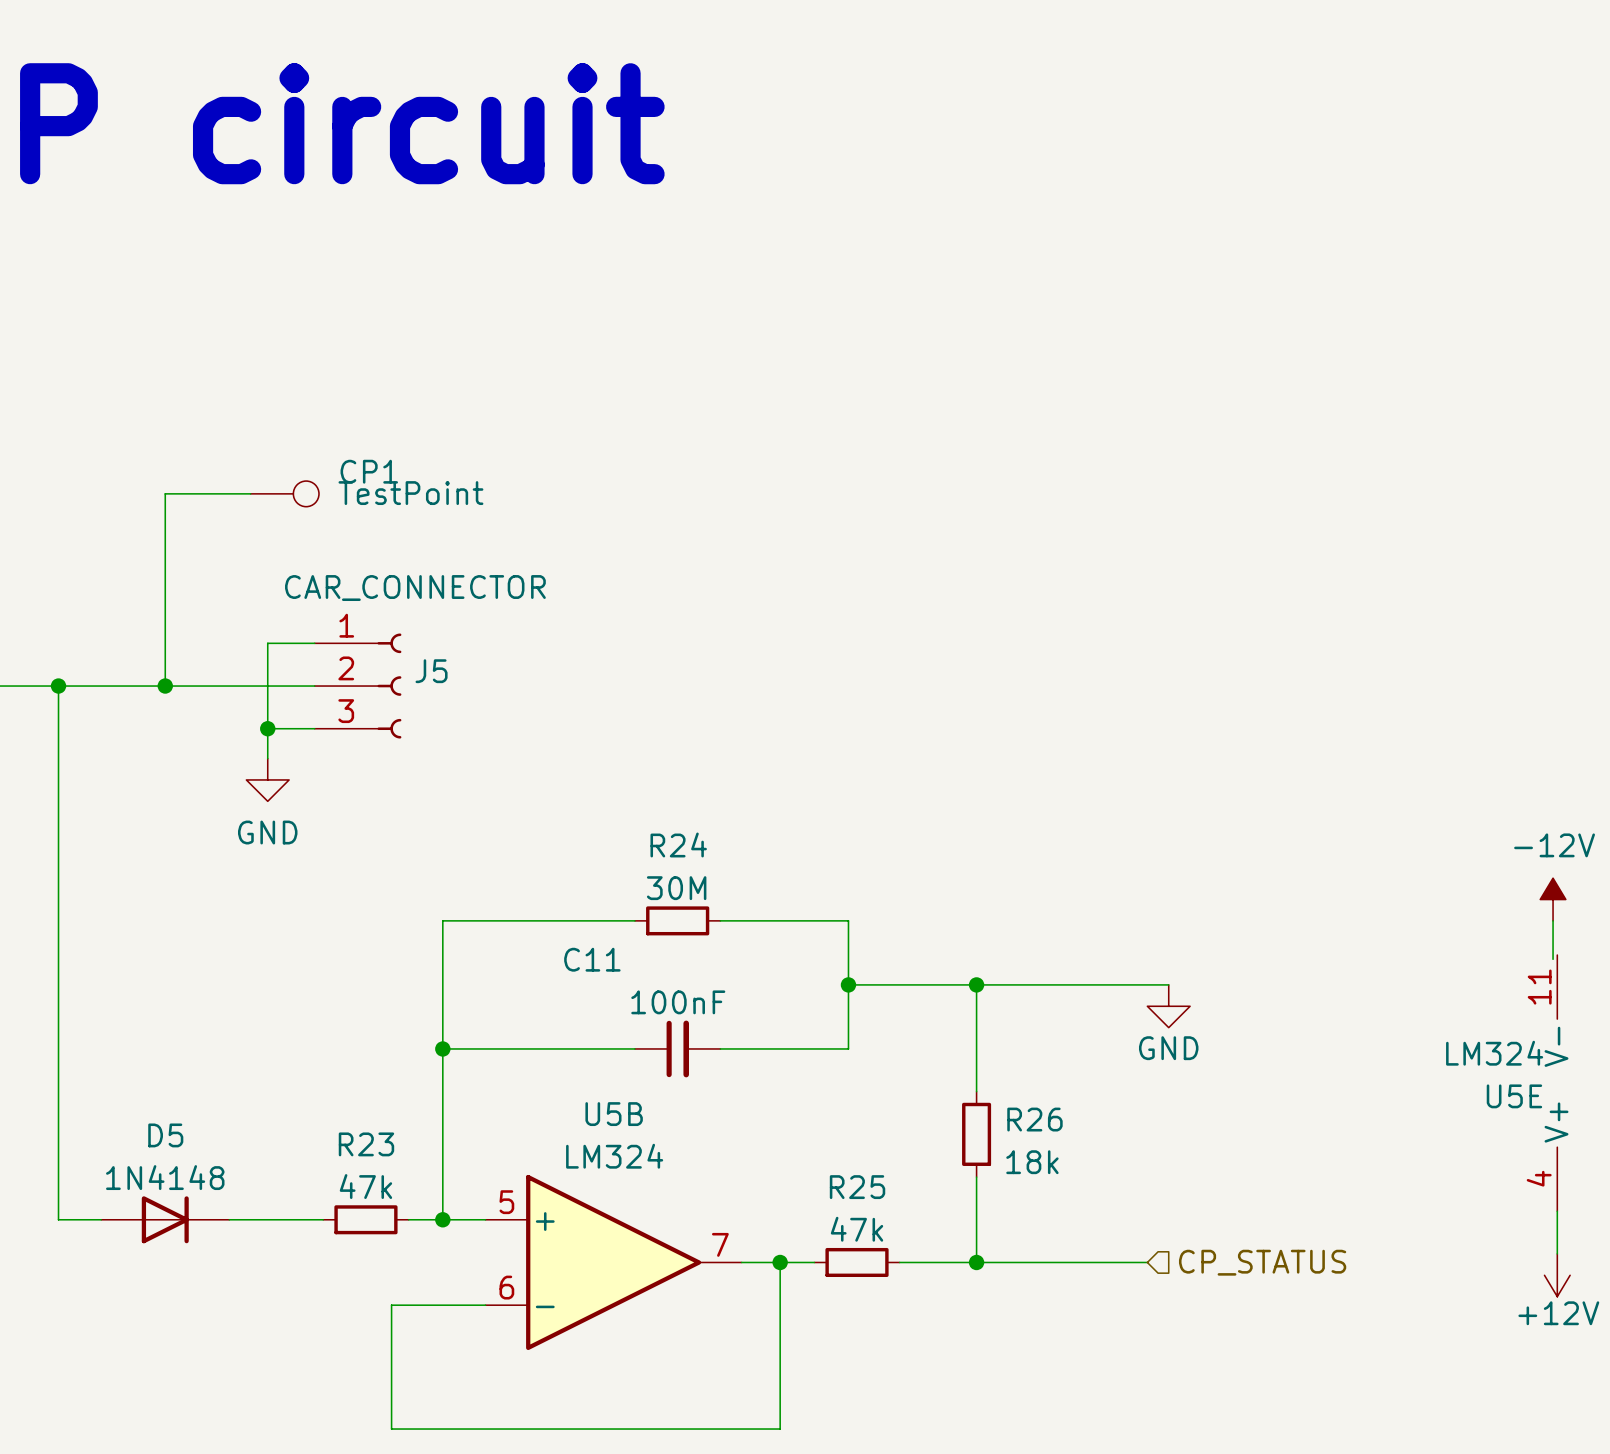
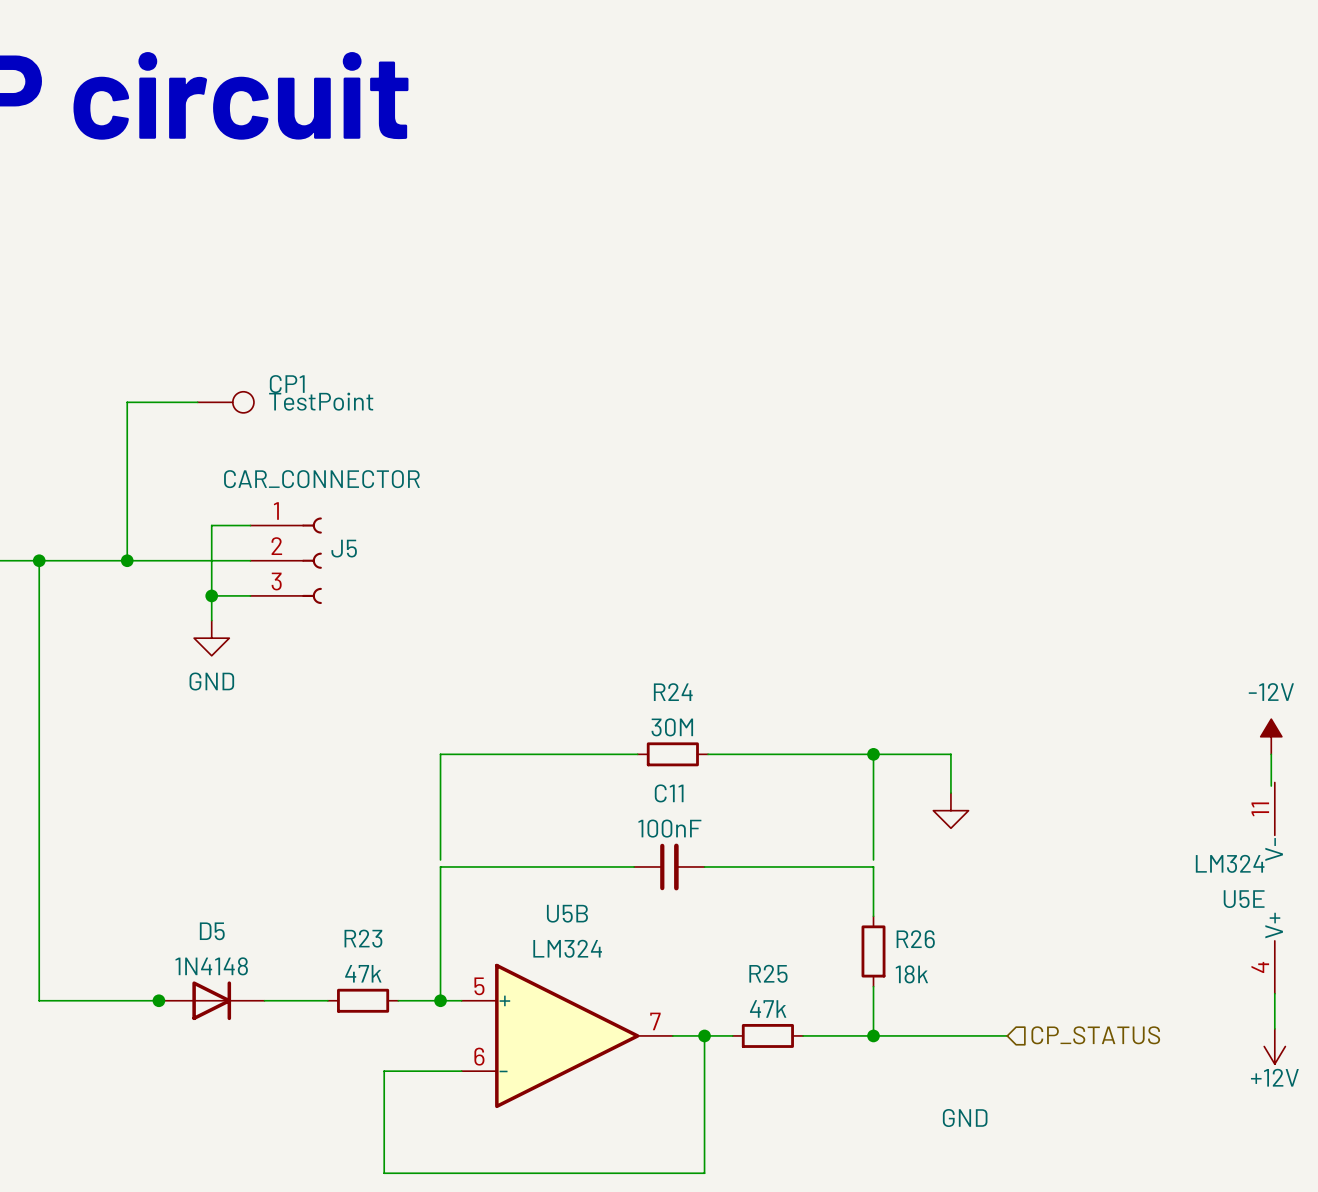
wire: (545, 920) (442, 920) (442, 1219) -> (440, 754) (440, 859)
wire: none -> (514, 754) (584, 754)
R24 position: (677, 920) -> (672, 754)
wire: (784, 920) (848, 920) (848, 1048) (720, 1048) -> none
wire: none -> (708, 754) (950, 754) (950, 793)
wire: none -> (873, 754) (873, 859)
junction: none -> (873, 754)
C11 name position: C11 (592, 959) -> C11 (669, 793)
wire: (848, 984) (1168, 984) -> none
junction: (848, 984) -> none
wire: (976, 984) (976, 1091) -> none
junction: (976, 984) -> none
power symbol position: GND (1168, 1006) -> GND (950, 810)
wire: (442, 1048) (634, 1048) -> none
junction: (442, 1048) -> none
C11 position: (677, 1048) -> (669, 866)
power symbol text position: GND (1168, 1048) -> GND (965, 1118)
wire: none -> (634, 866) (440, 866) (440, 1000)
wire: none -> (704, 866) (873, 866) (873, 916)
R26 position: (976, 1134) -> (873, 951)
wire: (976, 1177) (976, 1262) -> none
wire: none -> (873, 986) (873, 1035)
D5 position: (165, 1219) -> (211, 1000)
junction: none -> (158, 1000)
R23 position: (365, 1219) -> (363, 1000)
wire: (408, 1219) (485, 1219) -> (327, 1000) (264, 1000)
junction: (442, 1219) -> none
junction: none -> (440, 1000)
U5B position: (613, 1262) -> (567, 1035)
wire: (780, 1262) (780, 1429) -> (704, 1035) (704, 1173) (634, 1173)
junction: (780, 1262) -> none
R25 position: (857, 1262) -> (767, 1035)
junction: none -> (704, 1035)
wire: (899, 1262) (985, 1262) -> (732, 1035) (672, 1035)
junction: (976, 1262) -> none
junction: none -> (873, 1035)
wire: none -> (936, 1035) (1007, 1035)
hierarchical label position: CP_STATUS (1262, 1262) -> CP_STATUS (1095, 1035)
wire: (476, 1305) (391, 1305) (391, 1429) (476, 1429) -> (384, 1071) (384, 1173)

